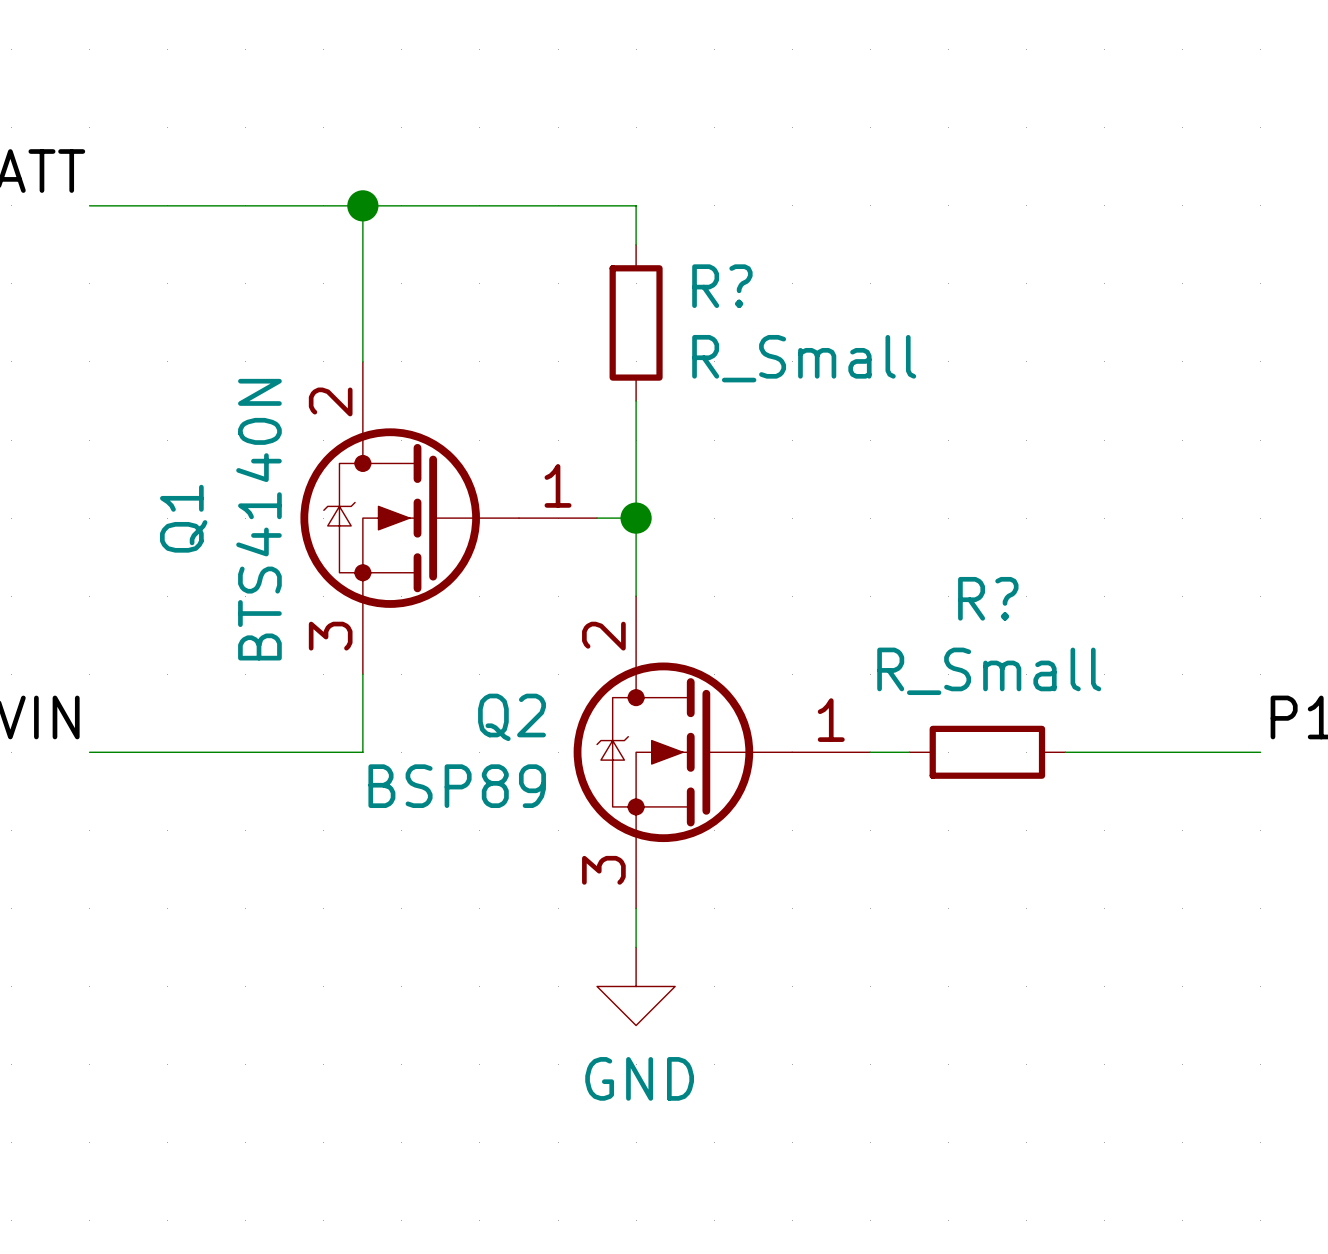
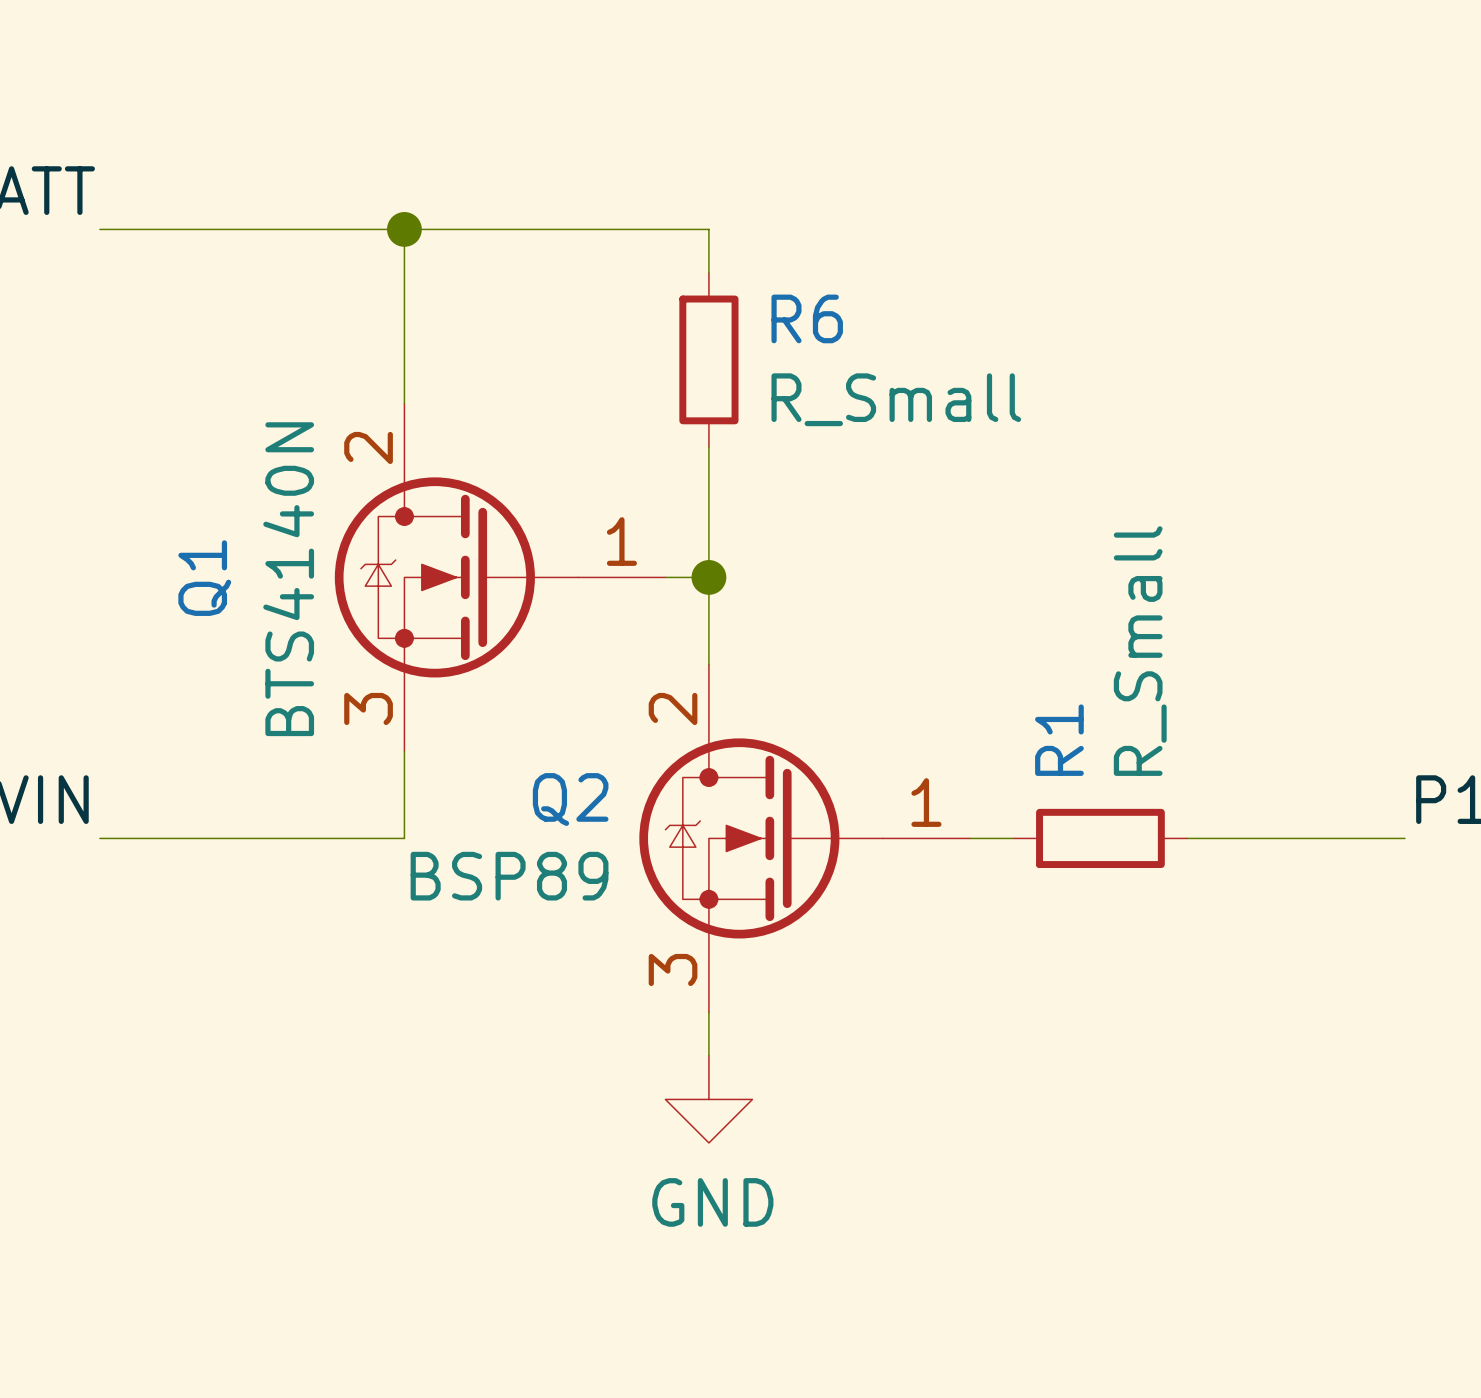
R? name: R? (722, 286) -> R6 (807, 318)
R? name: R? (988, 598) -> R1 (1059, 740)
R? value rotation: 0° (989, 671) -> 90° counterclockwise (1140, 651)

